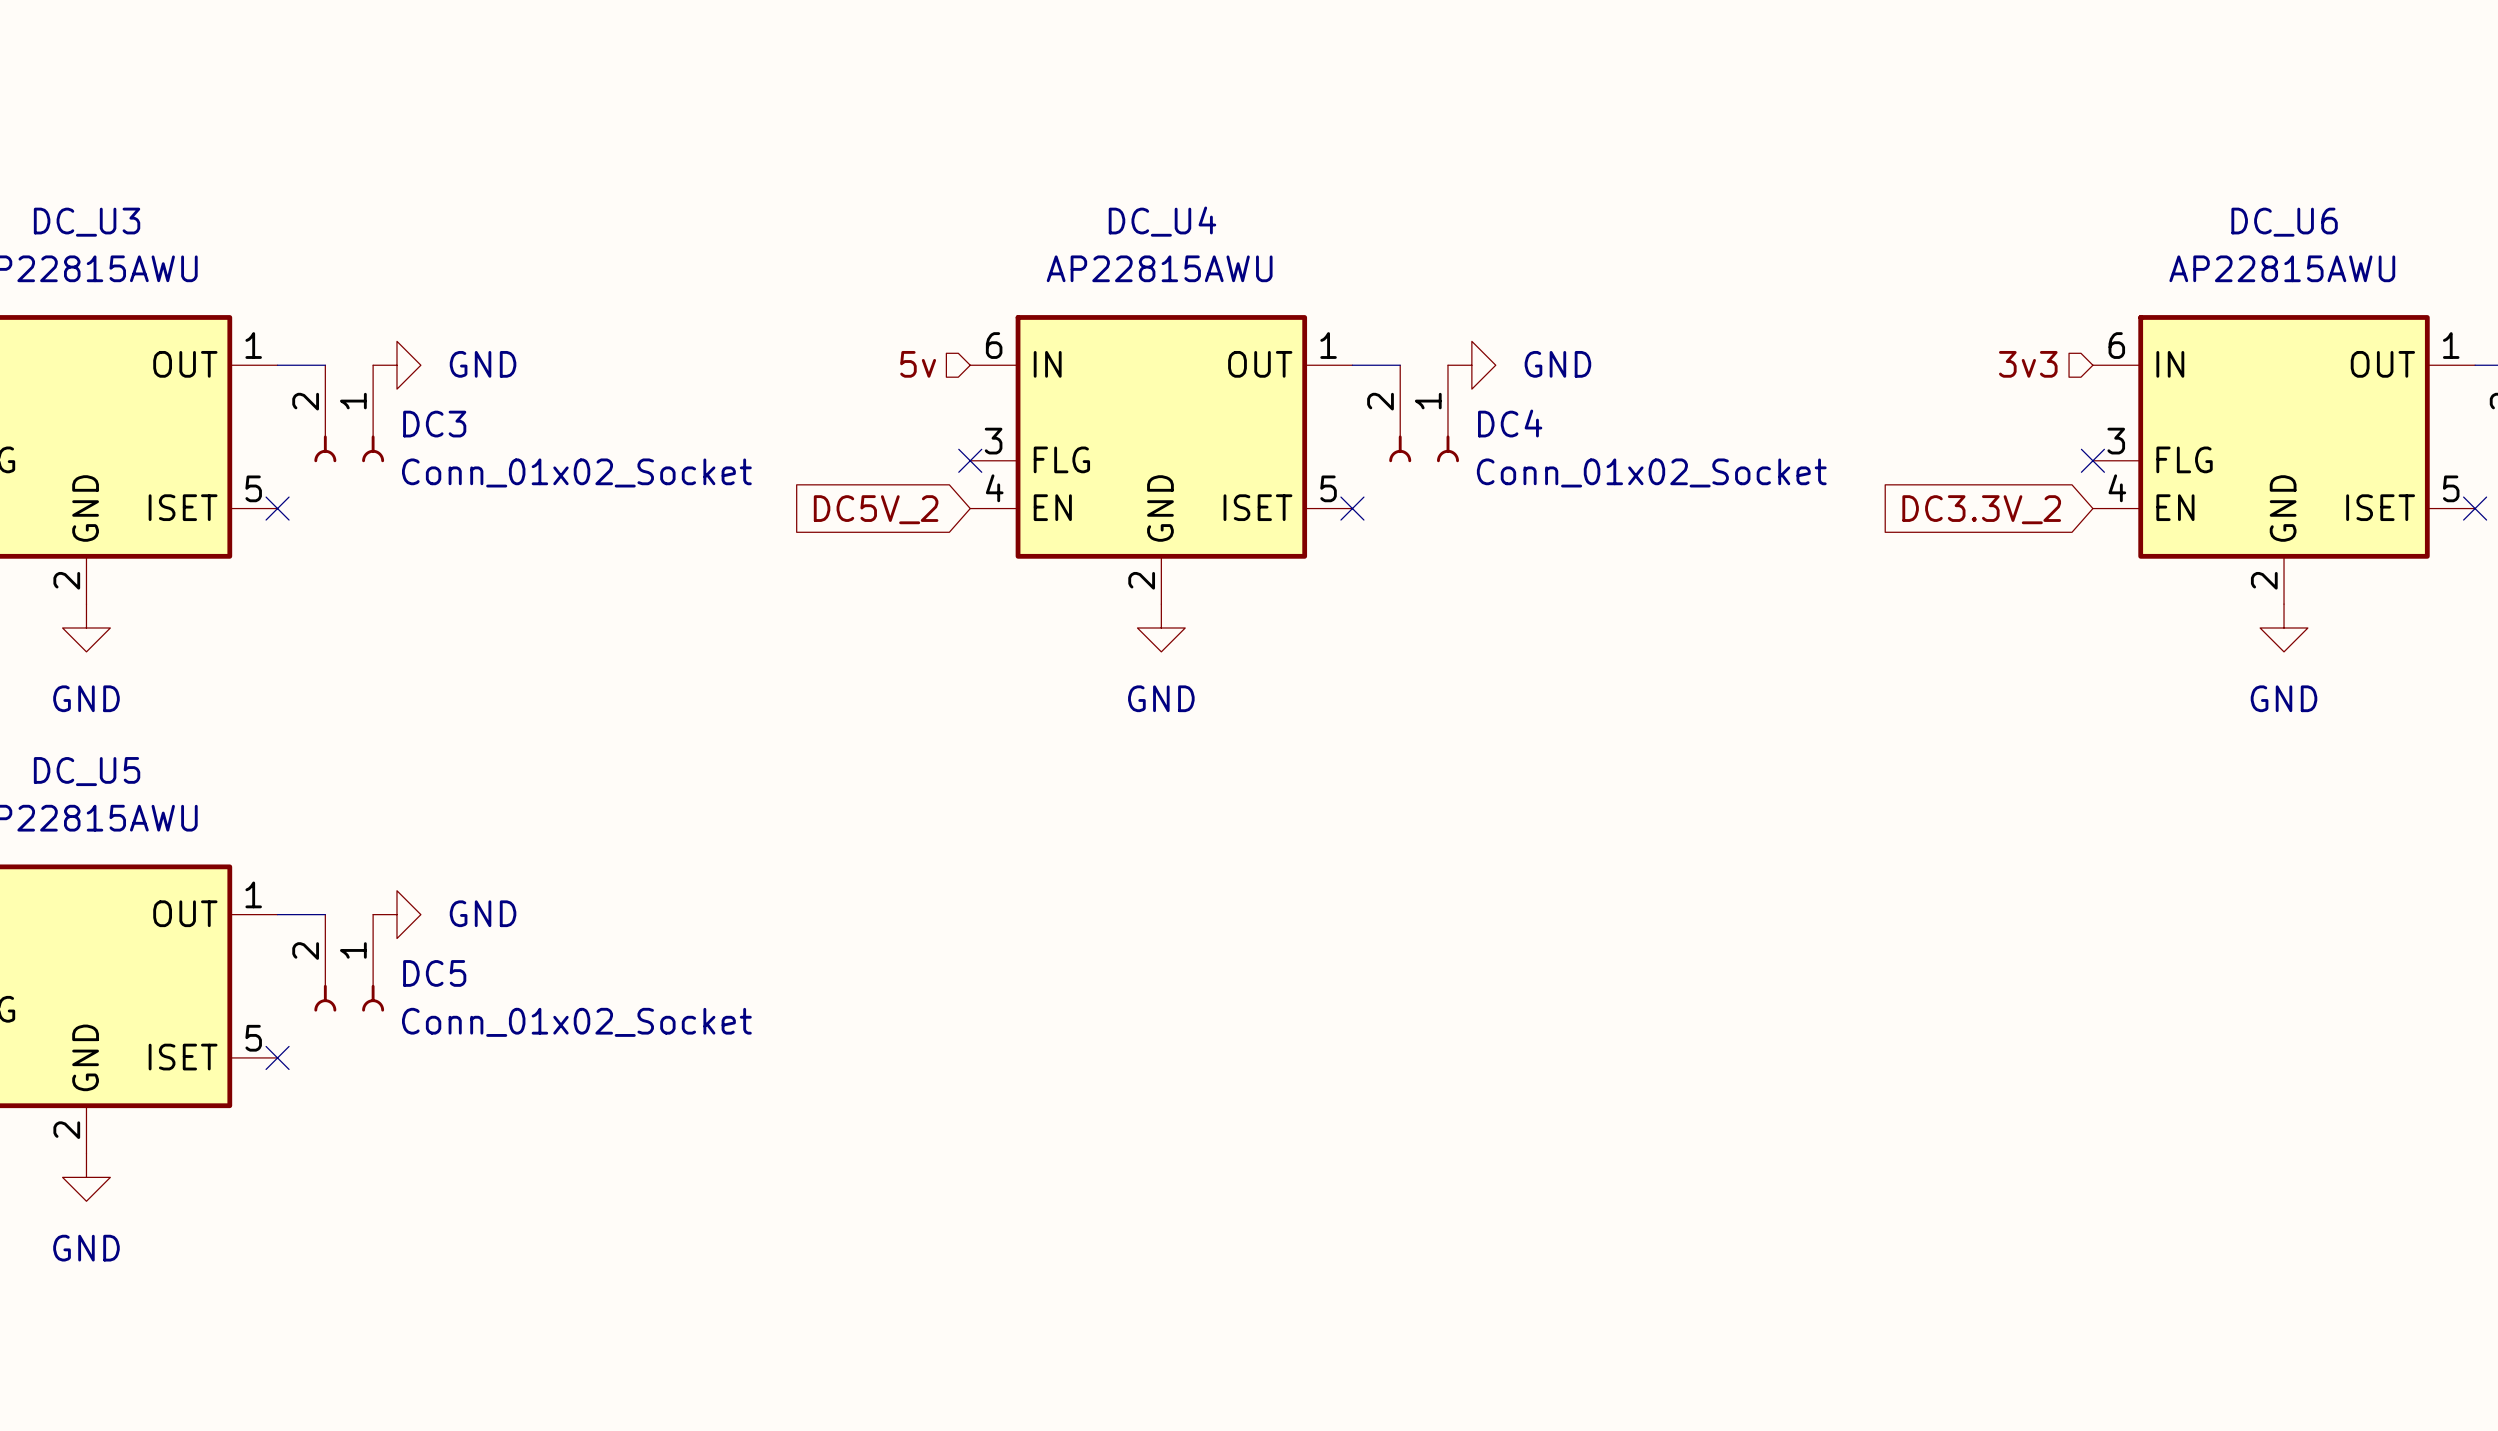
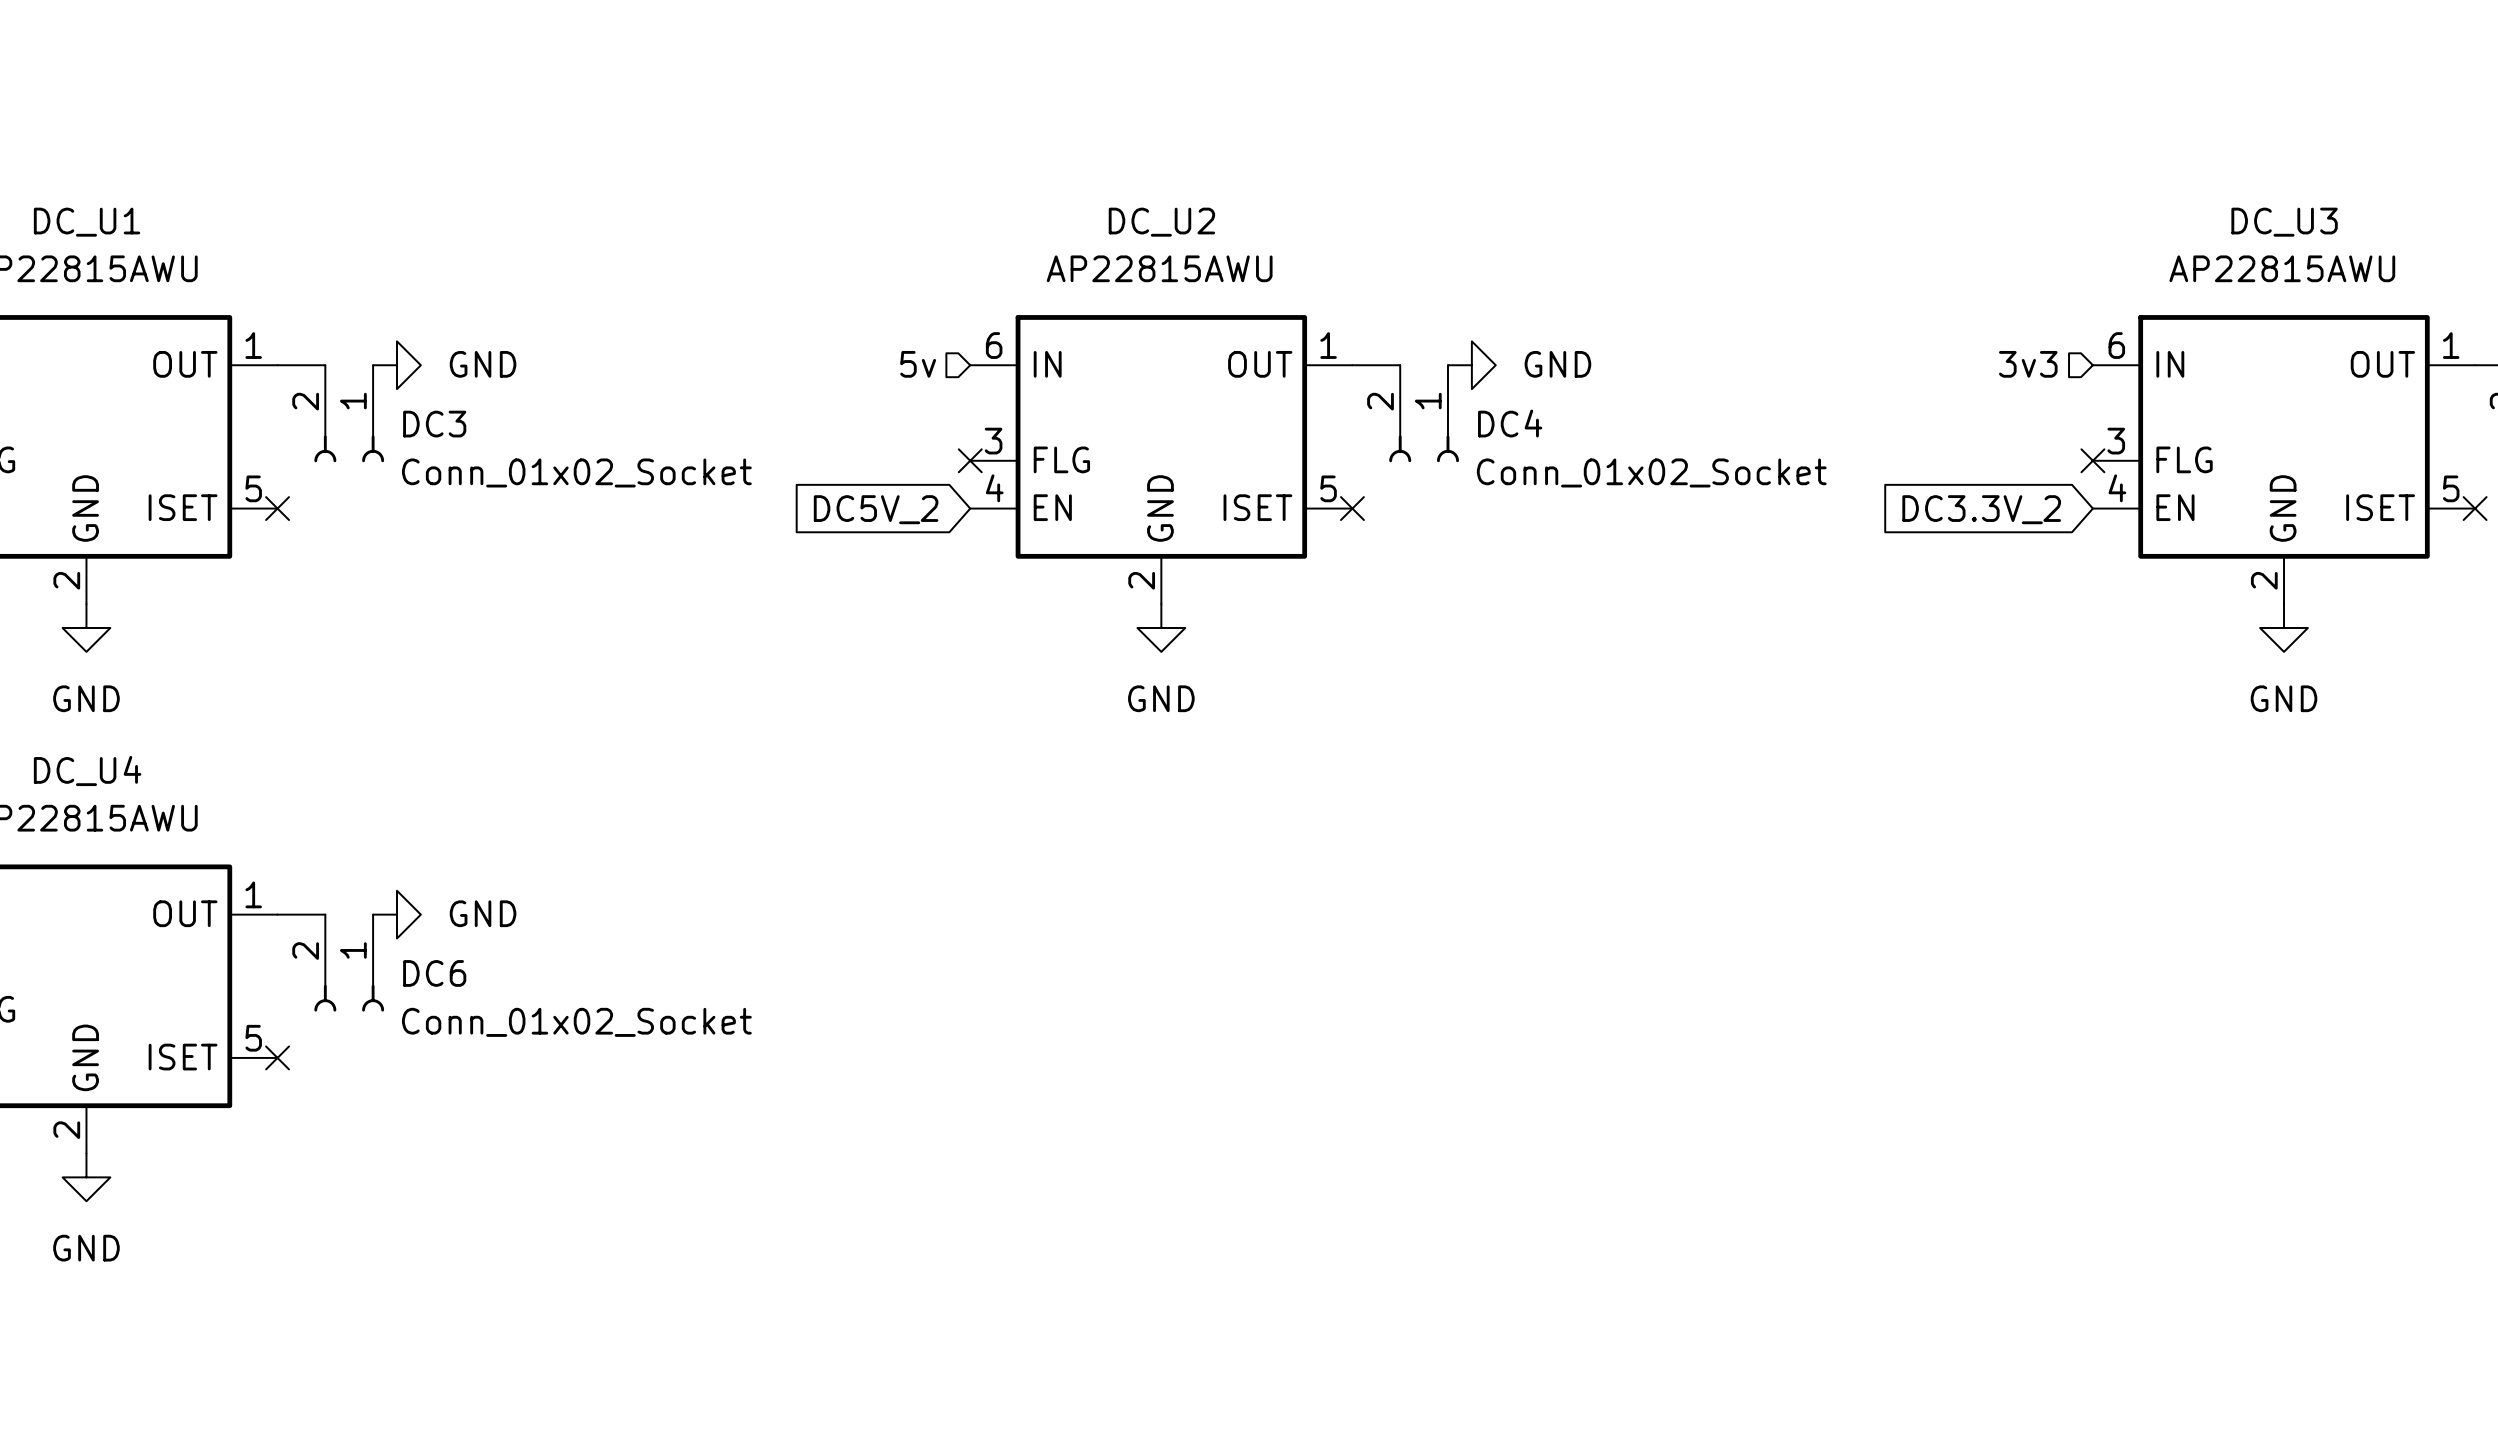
DC_U4 name: DC_U4 (1162, 221) -> DC_U2 (1161, 222)
DC_U3 name: DC_U3 (87, 222) -> DC_U1 (87, 222)
DC_U6 name: DC_U6 (2284, 222) -> DC_U3 (2284, 222)
DC_U5 name: DC_U5 (87, 771) -> DC_U4 (87, 770)
DC5 name: DC5 (434, 973) -> DC6 (434, 973)

